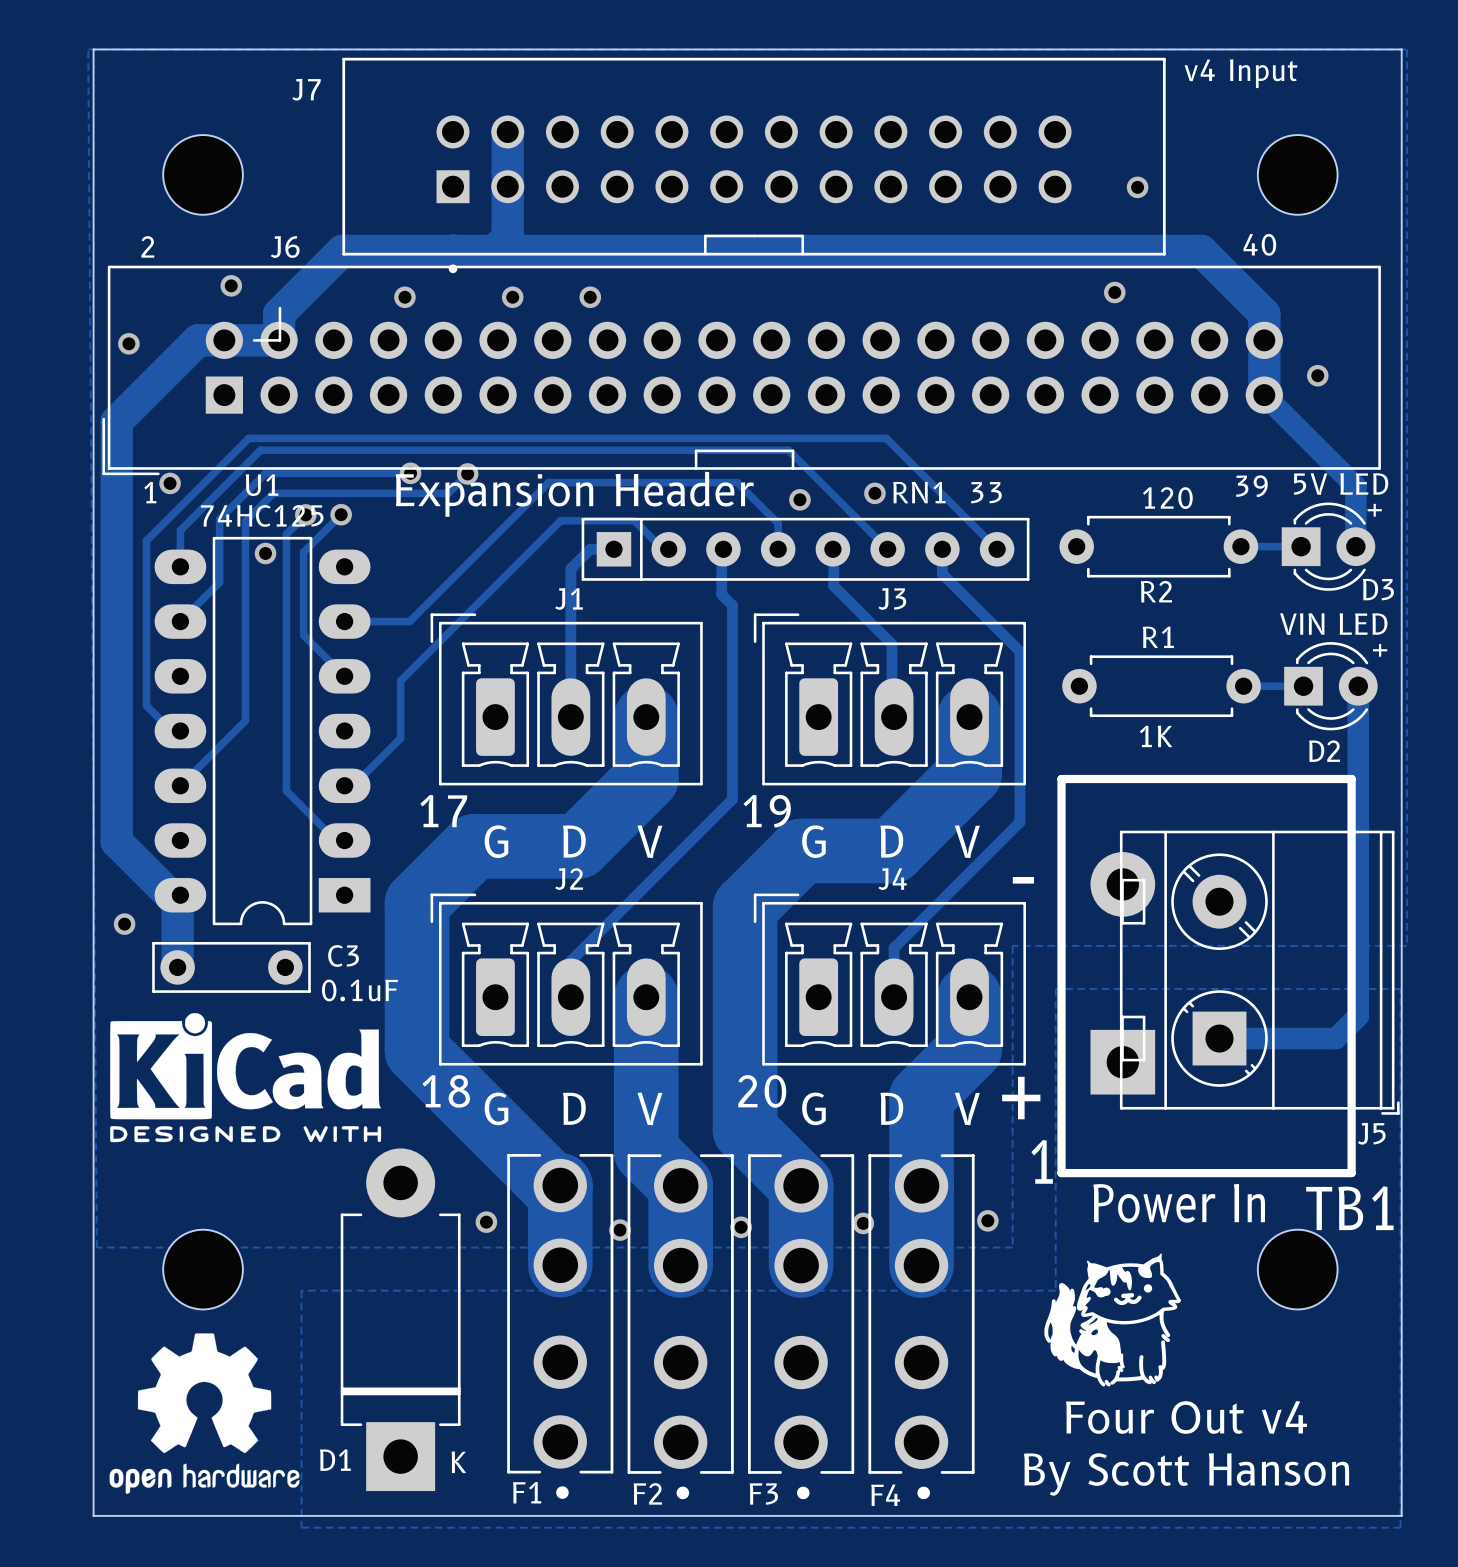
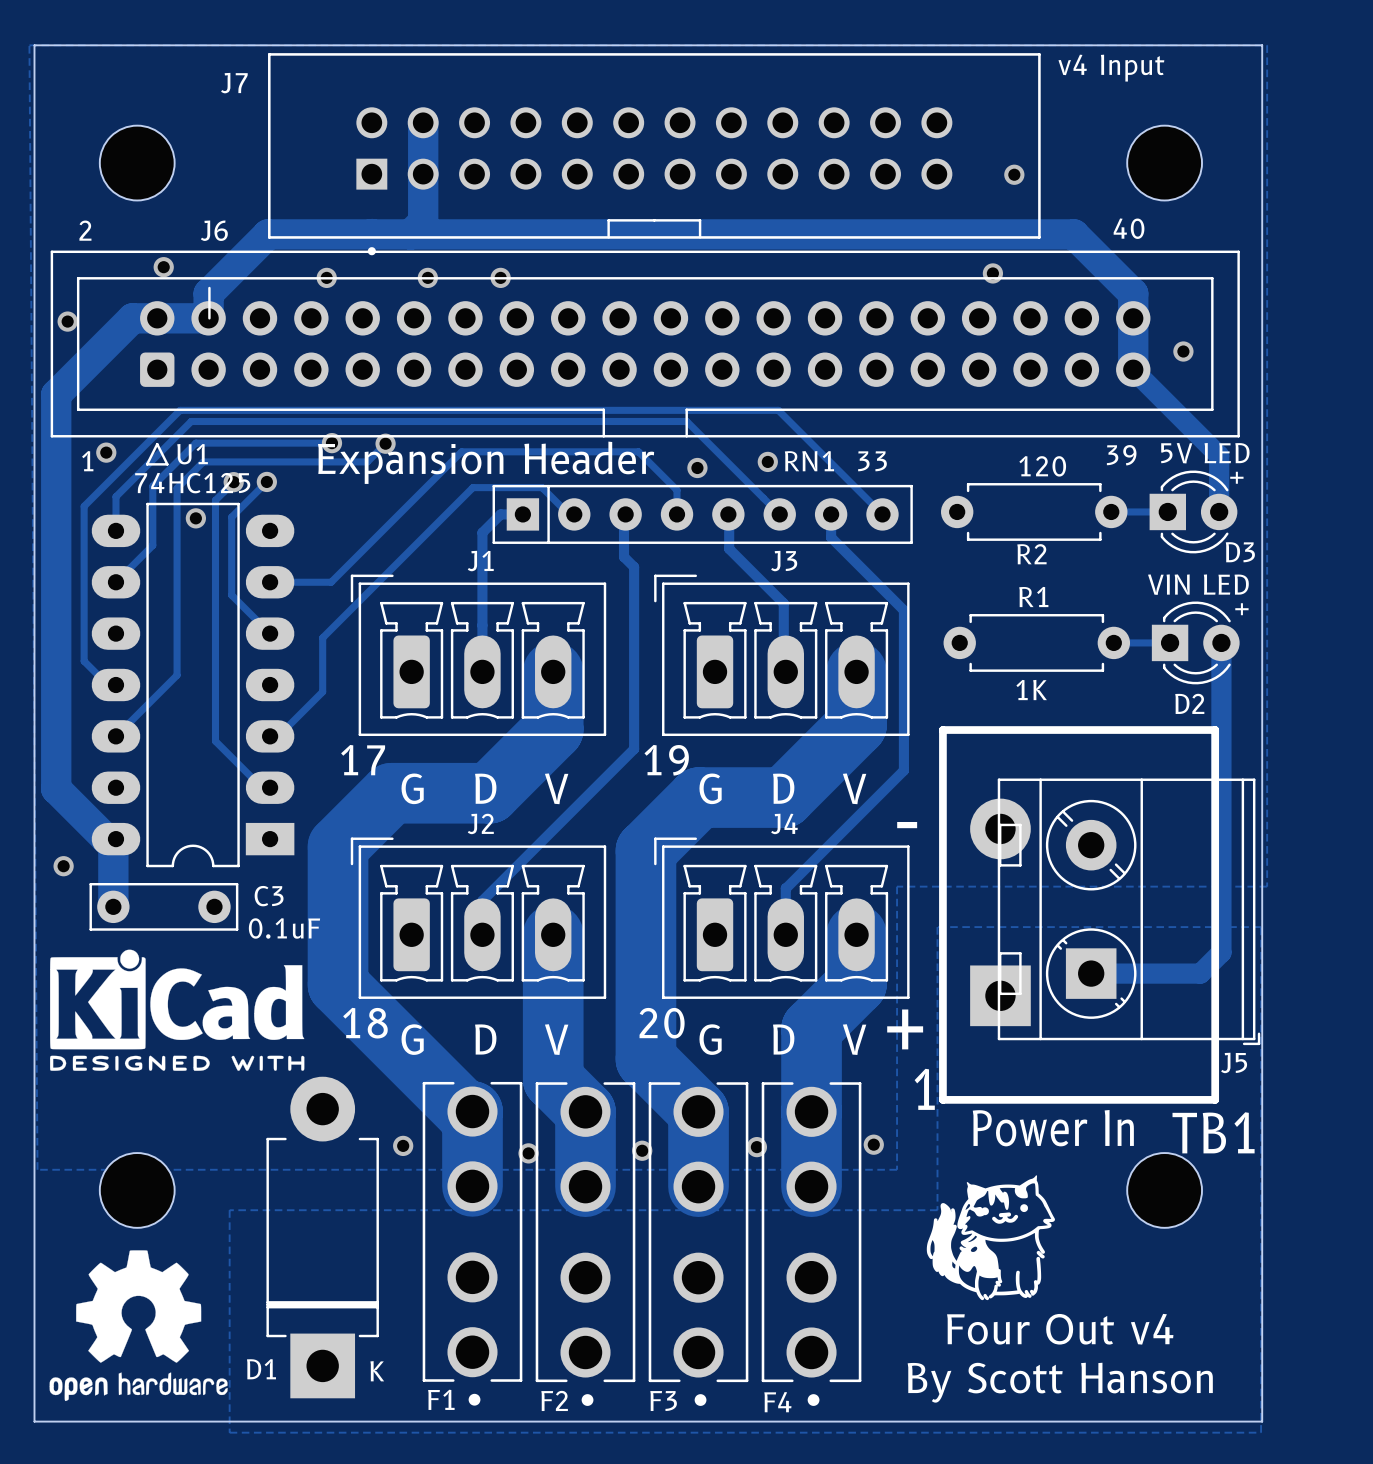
J6 footprint: [102, 265, 1381, 476] -> [50, 250, 1240, 466]
line: (254, 340) (279, 340) -> none
line: (696, 468) (696, 450) (793, 450) (793, 468) -> none

